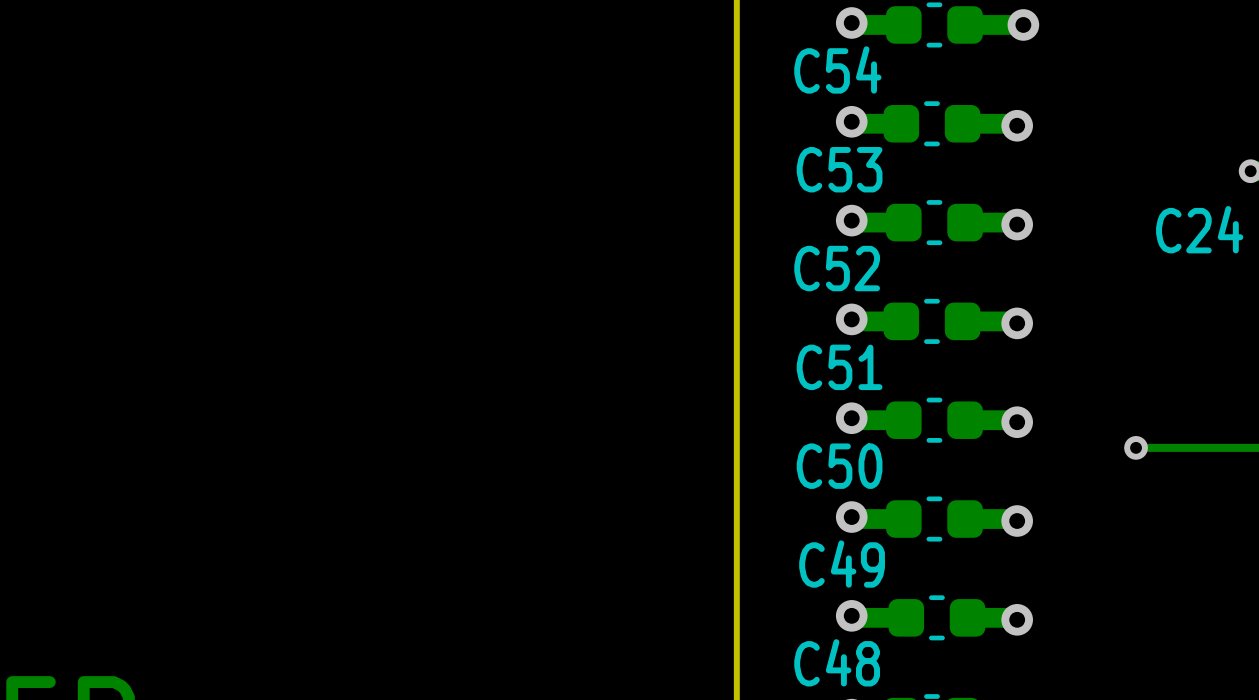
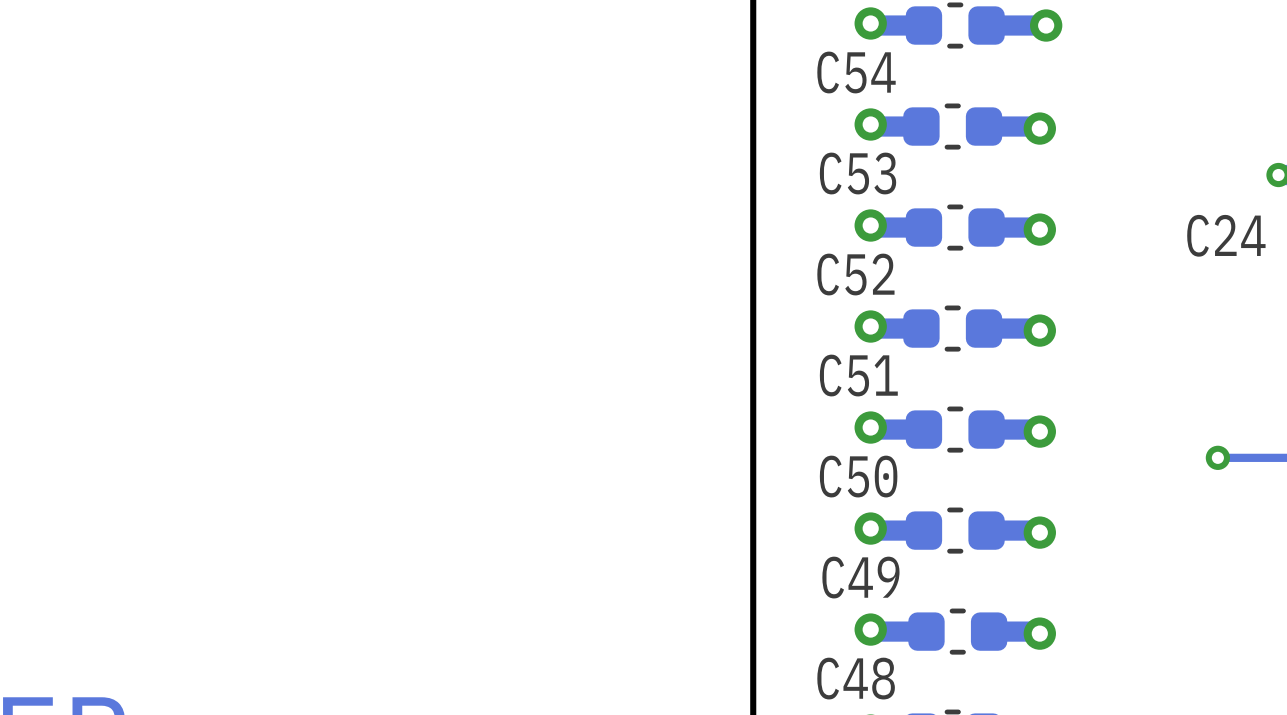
via position: (1136, 447) -> (1217, 457)
track: (1191, 447) (1136, 447) -> none

